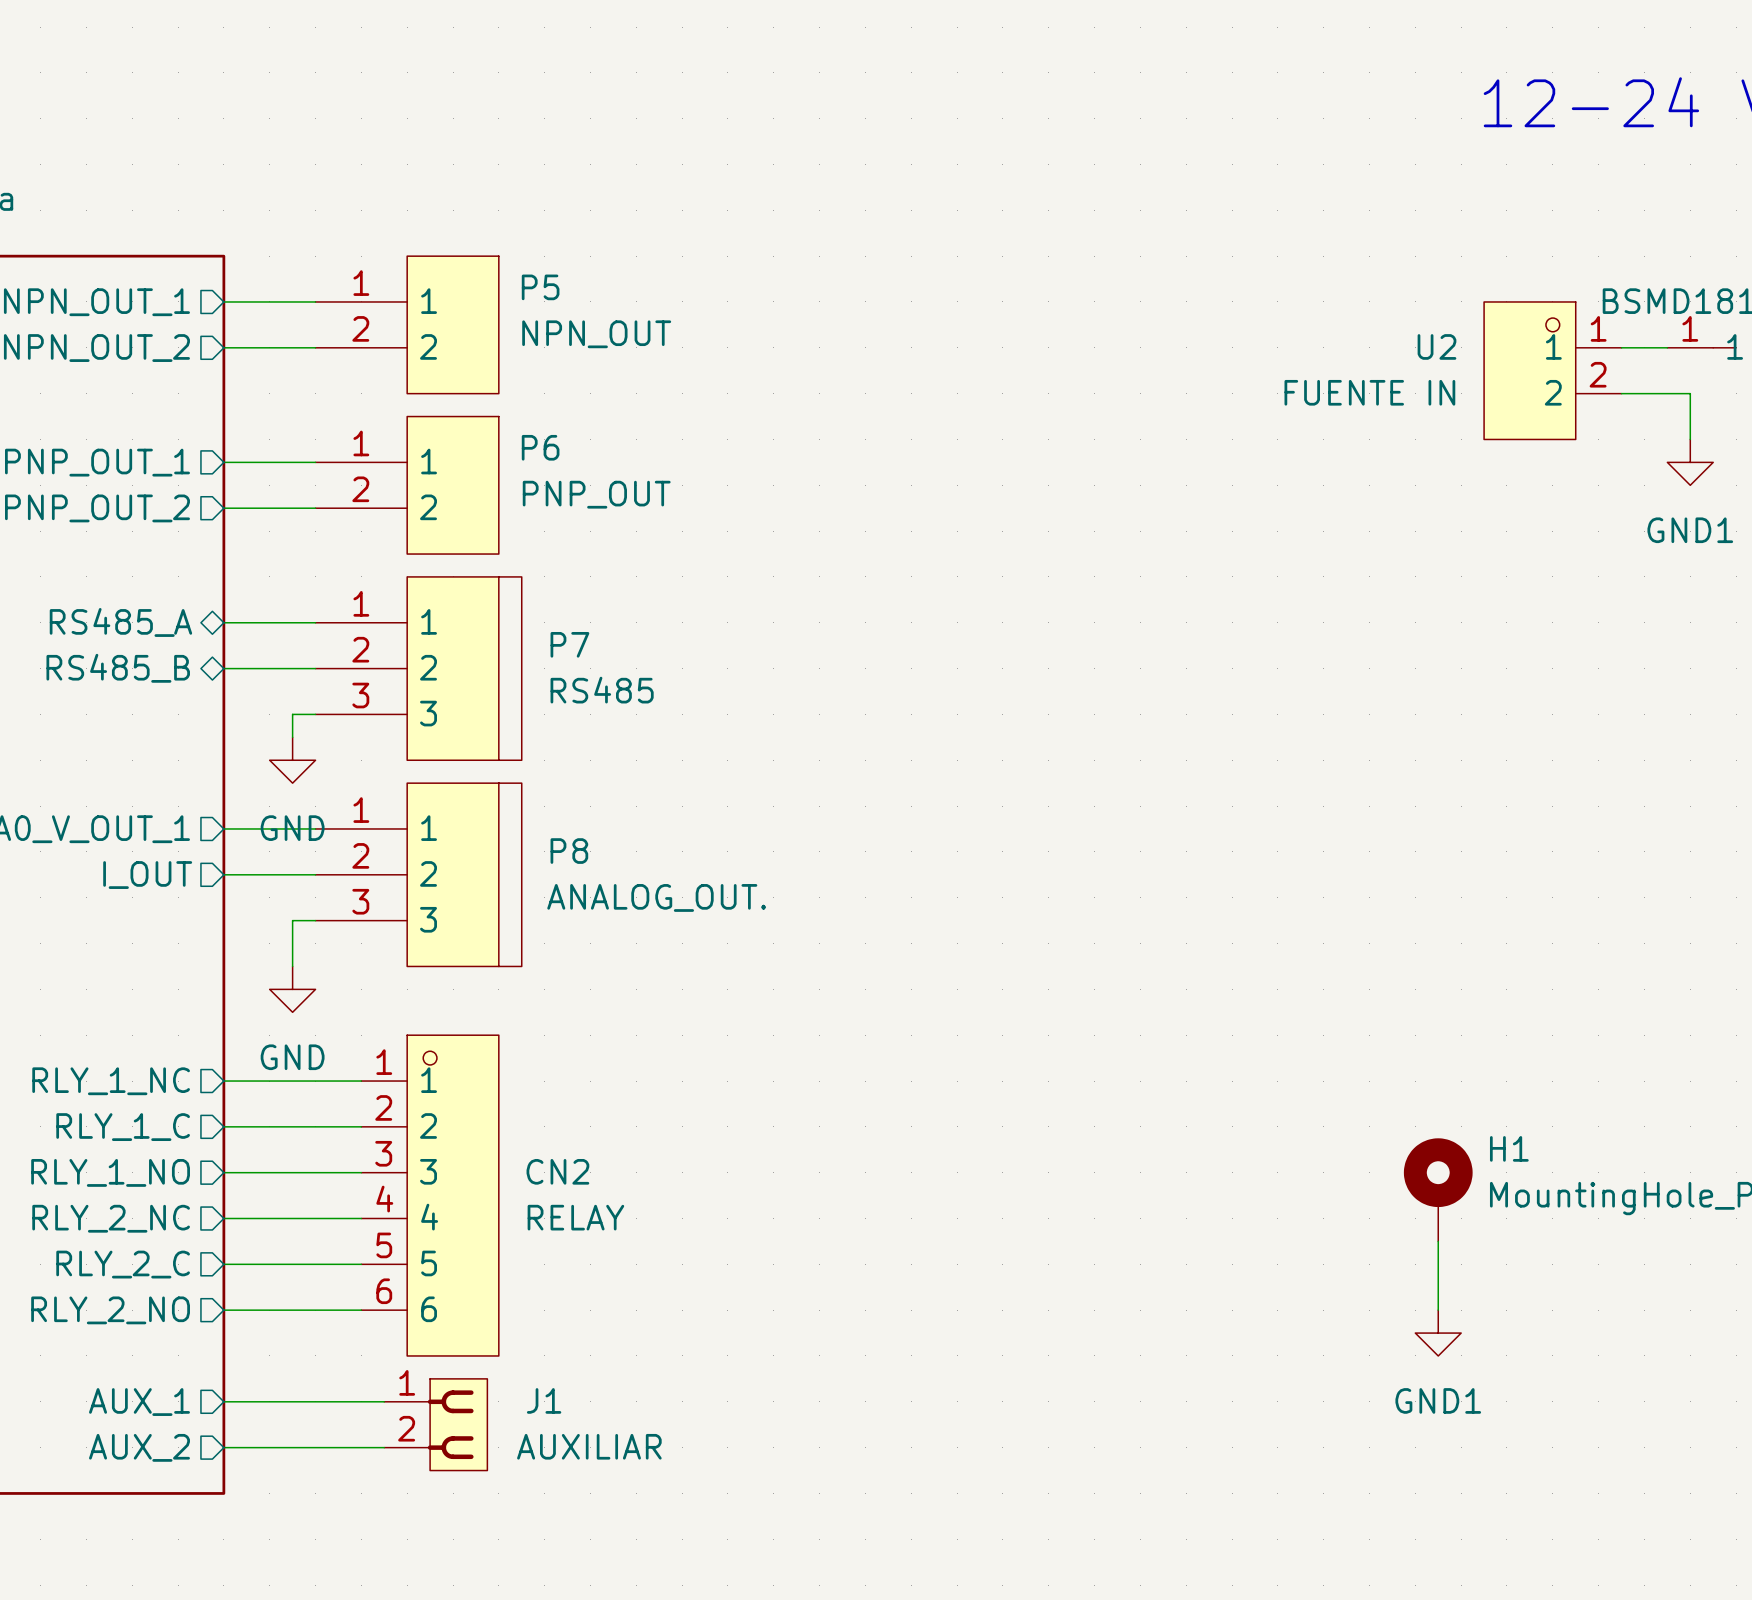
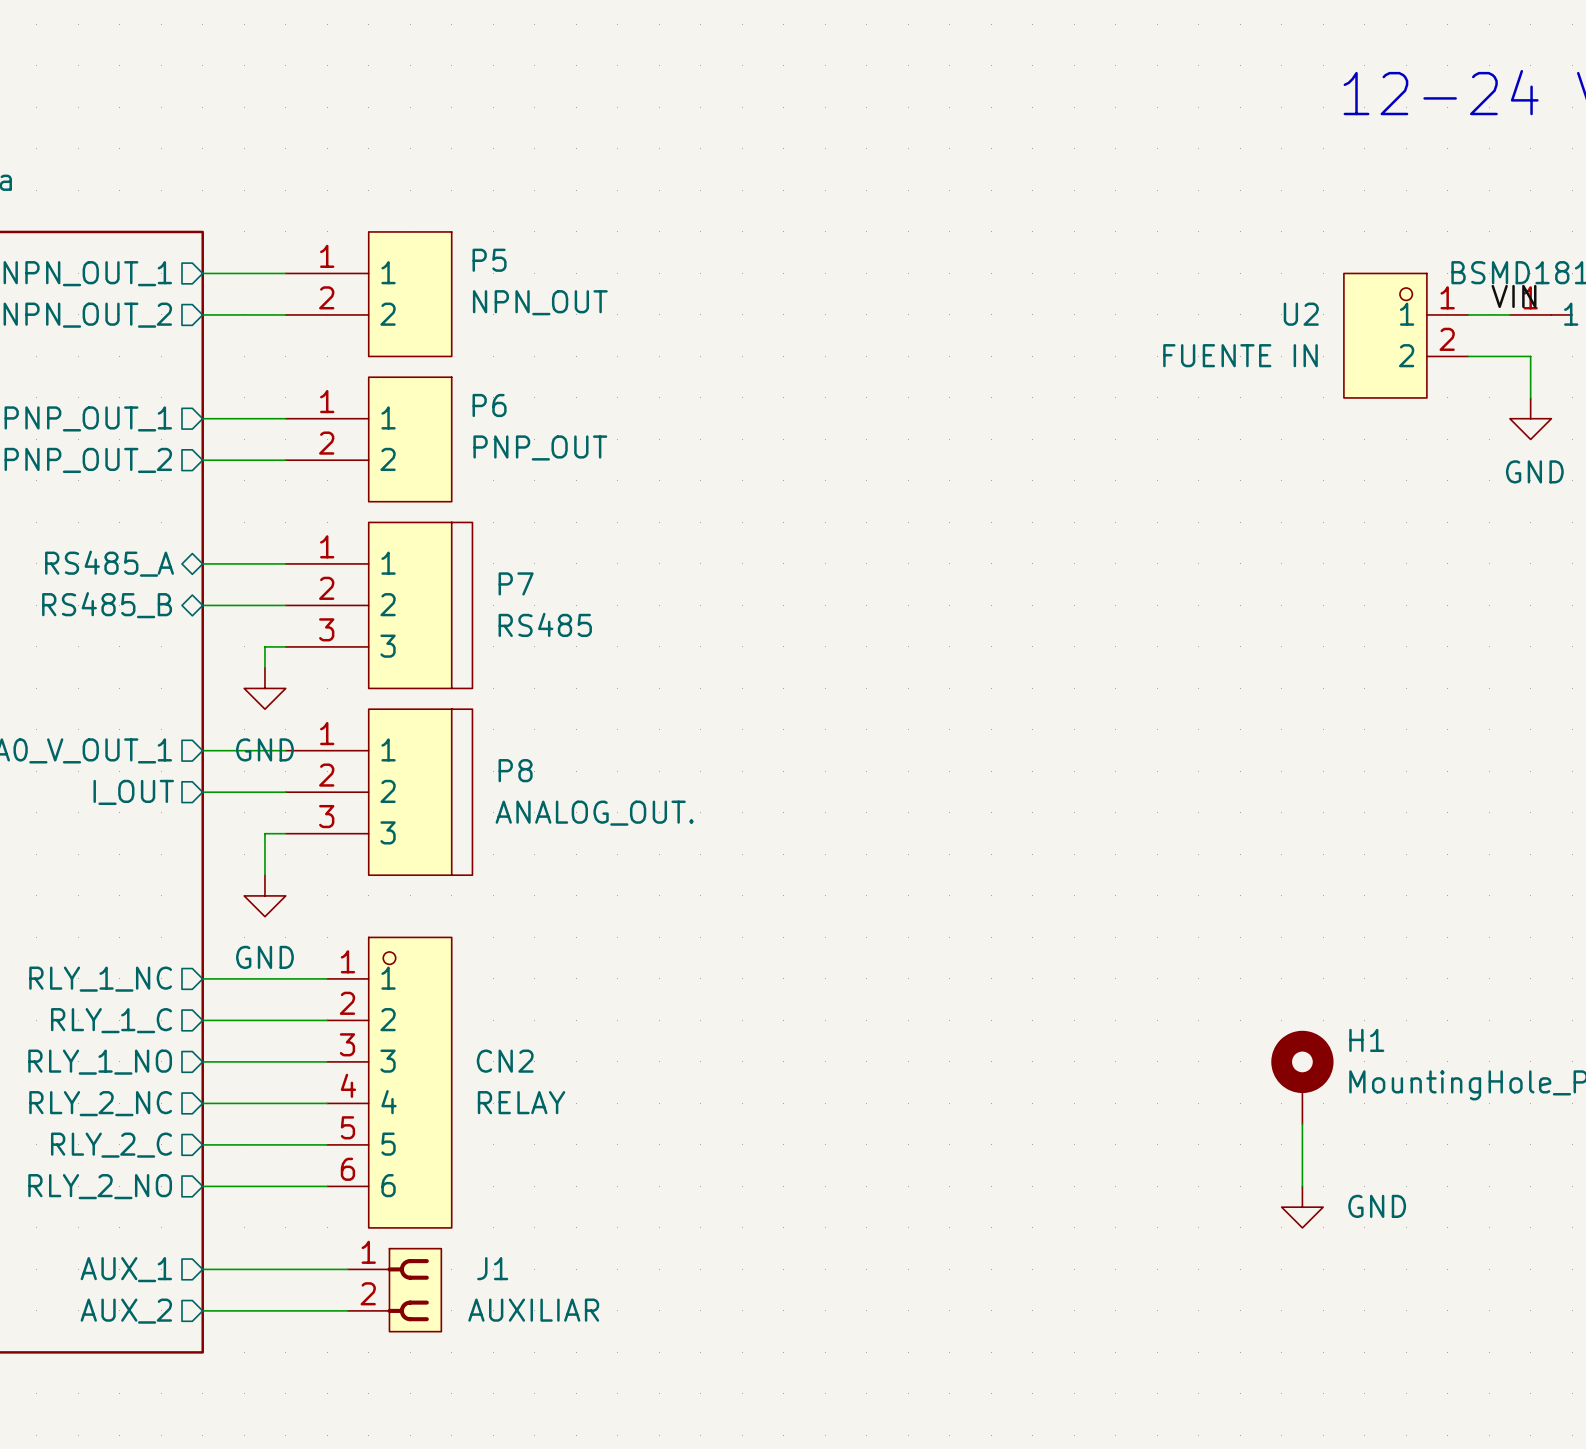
label: none -> VIN (1514, 296)
power symbol: GND1 (1690, 462) -> GND (1530, 418)
power symbol: GND1 (1438, 1333) -> GND (1302, 1207)

